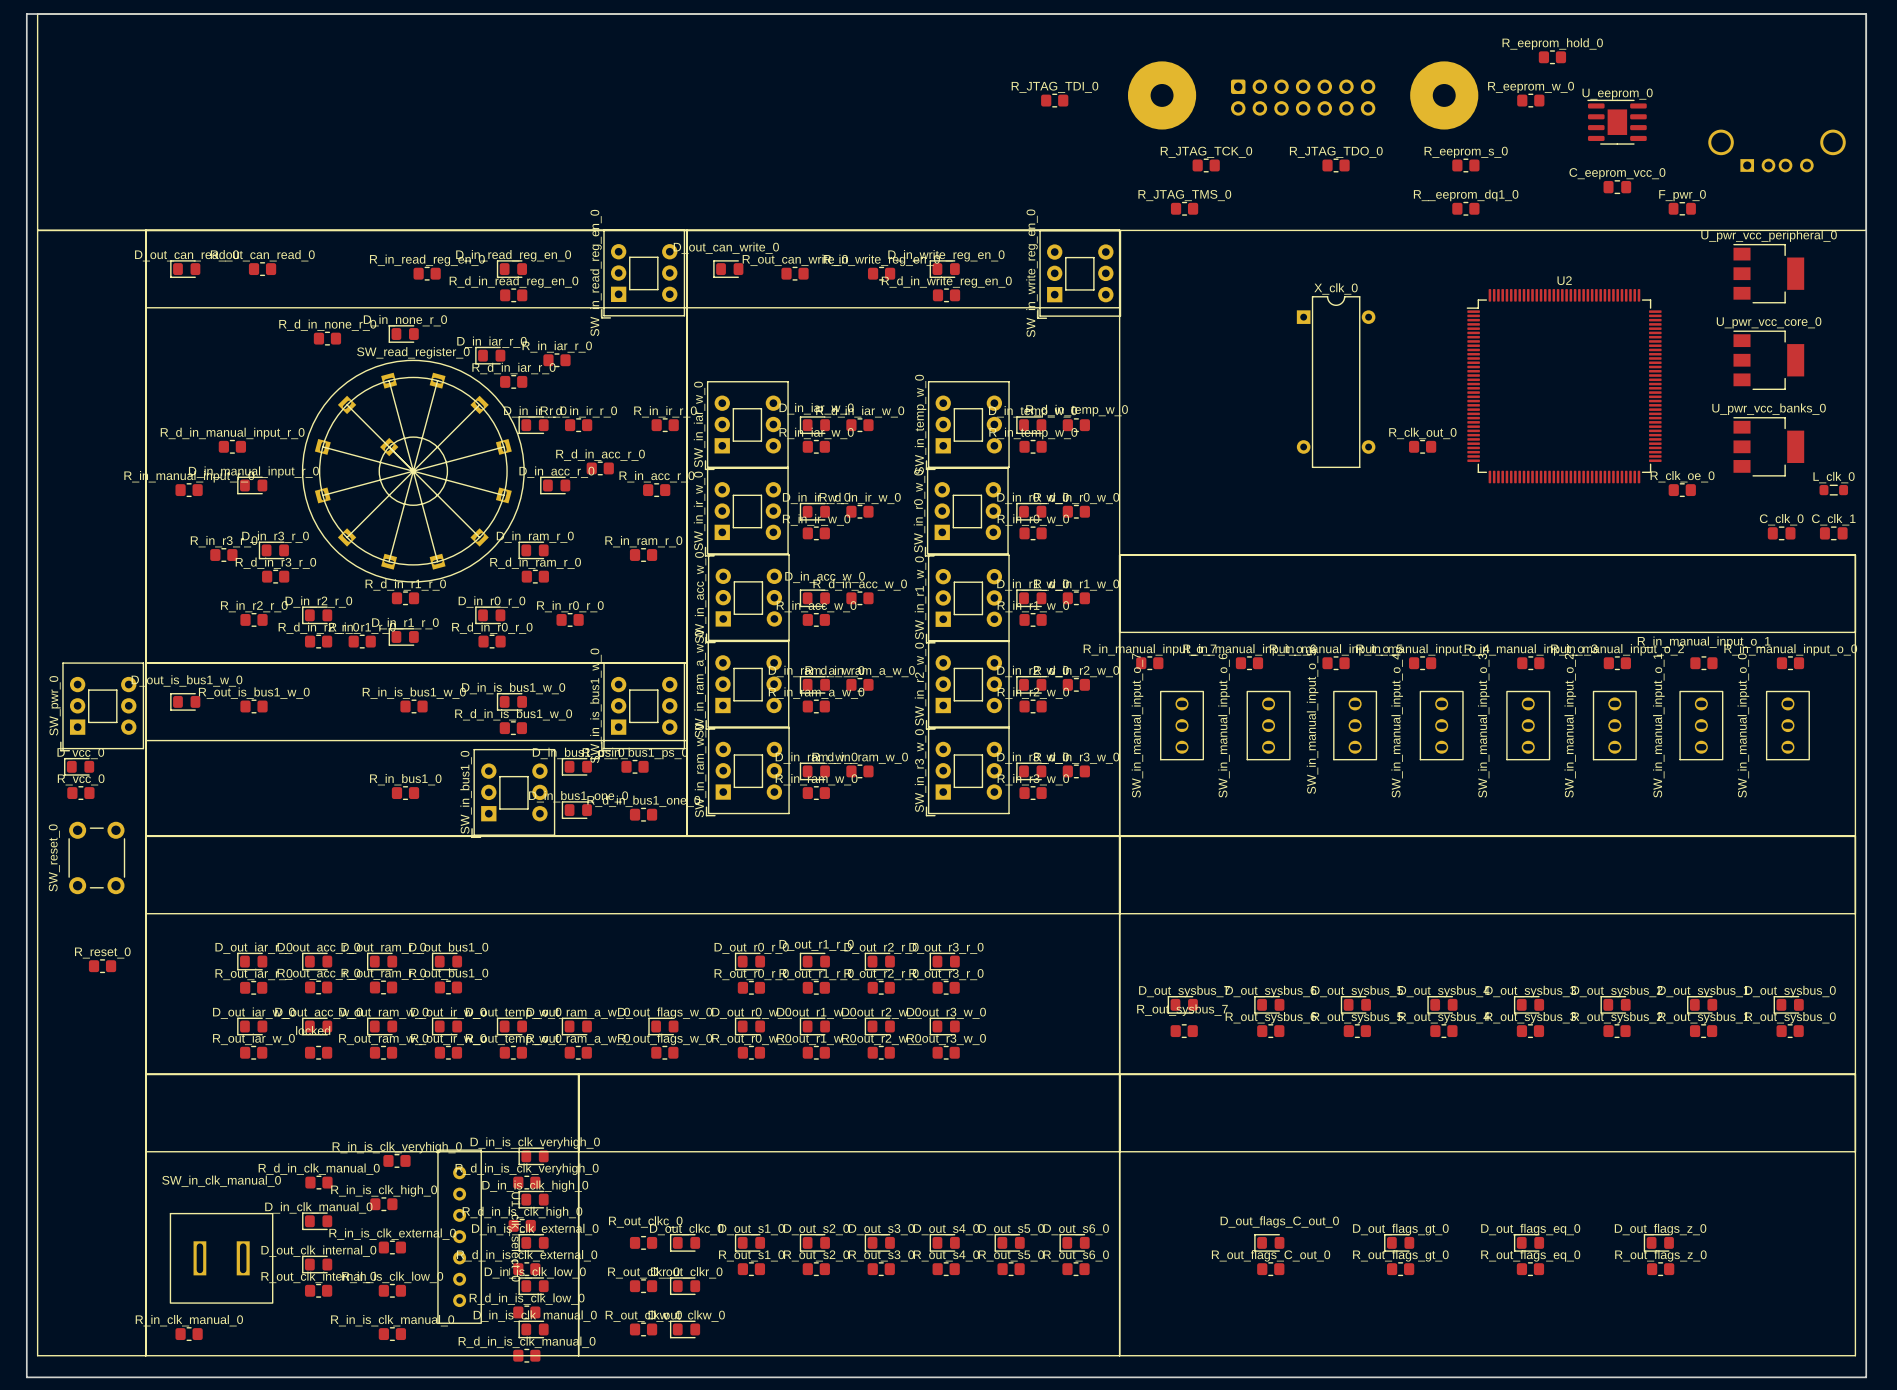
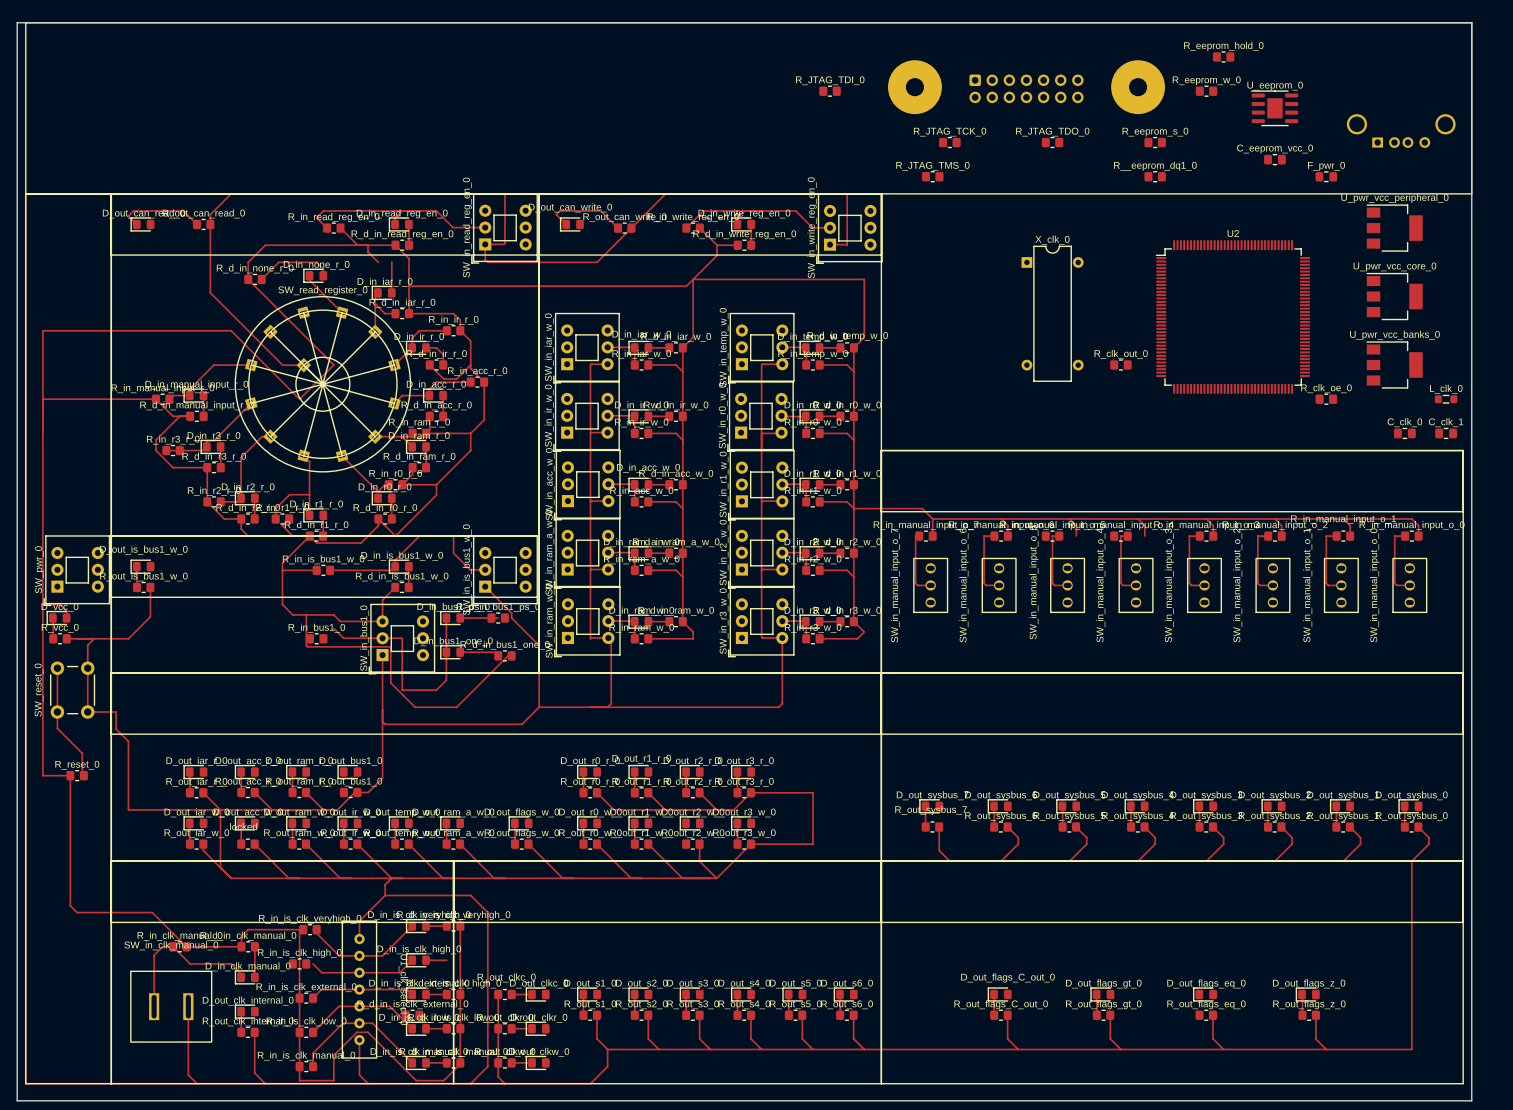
top track: none -> (231, 193) (210, 214) (210, 292) (282, 365) (303, 365)
top track: none -> (402, 210) (395, 218) (395, 224)
top track: none -> (744, 210) (737, 218) (737, 224)
top track: none -> (136, 224) (128, 216) (133, 210) (183, 210) (196, 224)
top track: none -> (408, 224) (408, 245)
top track: none -> (566, 224) (556, 214) (559, 210) (600, 210) (617, 228)
top track: none -> (751, 224) (751, 245)
top track: none -> (340, 228) (357, 245)
top track: none -> (485, 227) (453, 227) (436, 210) (323, 210) (316, 217) (327, 228)
top track: none -> (699, 228) (717, 245)
top track: none -> (830, 227) (812, 228) (795, 210) (703, 210) (686, 228)
top track: none -> (830, 244) (847, 245) (847, 193) (665, 193) (597, 262) (487, 262) (485, 259) (485, 244) (504, 243) (504, 193) (25, 193) (25, 1083) (590, 1083) (607, 1066) (607, 1049)
top track: none -> (368, 245) (368, 251) (378, 262)
top track: none -> (717, 245) (737, 245)
top track: none -> (717, 245) (717, 255) (686, 286) (408, 286)
top track: none -> (391, 262) (391, 292)
top track: none -> (309, 275) (309, 280) (342, 312)
top track: none -> (323, 275) (323, 268) (316, 262) (278, 262) (261, 279)
top track: none -> (377, 292) (375, 295) (375, 331)
R_in_iar_r_0: (556, 360) -> none
top track: none -> (375, 303) (385, 313) (395, 313)
top track: none -> (446, 330) (419, 330) (412, 337) (412, 347) (394, 365)
top track: none -> (611, 347) (634, 347) (634, 364)
top track: none -> (782, 347) (805, 347) (806, 364)
top track: none -> (425, 347) (436, 347) (443, 354) (443, 364)
R_d_in_ir_r_0 position: (578, 425) -> (436, 364)
R_in_ir_r_0 position: (665, 425) -> (453, 330)
top track: none -> (648, 347) (669, 347)
top track: none -> (819, 347) (840, 347)
top track: none -> (611, 364) (590, 364) (590, 638) (611, 637) (611, 703) (607, 707)
top track: none -> (782, 364) (761, 364) (761, 637) (782, 637) (782, 703) (778, 707) (539, 707)
R_d_in_manual_input_r_0 position: (232, 446) -> (196, 416)
top track: none -> (251, 365) (213, 365) (189, 389) (189, 395) (173, 395) (169, 399)
top track: none -> (429, 364) (443, 379) (456, 379) (470, 364)
top track: none -> (648, 364) (676, 364) (682, 371)
top track: none -> (819, 364) (847, 364) (853, 371)
top track: none -> (470, 382) (436, 382) (429, 389) (429, 395) (402, 395) (394, 403)
R_d_in_acc_r_0 position: (600, 468) -> (436, 416)
top track: none -> (203, 395) (203, 416)
top track: none -> (443, 395) (443, 416)
top track: none -> (42, 399) (155, 399) (173, 416) (190, 416)
R_in_manual_input_r_0 position: (189, 490) -> (162, 399)
R_in_acc_r_0 position: (656, 490) -> (477, 382)
top track: none -> (251, 403) (214, 440) (206, 440) (206, 446) (203, 450) (169, 450)
top track: none -> (179, 416) (155, 440) (155, 450) (173, 467) (207, 467) (207, 501) (224, 518) (241, 518) (241, 529) (248, 536) (309, 536)
top track: none -> (429, 416) (429, 429) (426, 433) (470, 433)
top track: none -> (611, 415) (634, 415) (634, 433)
top track: none -> (648, 416) (669, 416)
top track: none -> (819, 416) (840, 416)
top track: none -> (782, 416) (805, 416) (806, 433)
top track: none -> (611, 432) (590, 433)
top track: none -> (412, 433) (409, 436) (375, 436)
top track: none -> (470, 433) (484, 419) (484, 382) (470, 368) (470, 341) (460, 330) (460, 320) (453, 313) (408, 313) (408, 258) (395, 245) (265, 245) (248, 262) (248, 279) (333, 364) (299, 399) (231, 330) (42, 330) (42, 775) (70, 775) (70, 905) (77, 912) (152, 912) (186, 946) (241, 946) (241, 936) (248, 929) (299, 929) (299, 1080) (333, 1080) (333, 1055) (356, 1032) (368, 1032) (416, 1080) (443, 1080) (460, 1064) (460, 919)
top track: none -> (470, 433) (470, 450) (436, 484)
top track: none -> (648, 433) (676, 433) (682, 440)
top track: none -> (761, 433) (782, 433)
top track: none -> (819, 433) (847, 433) (853, 440)
top track: none -> (270, 436) (262, 436) (241, 457) (241, 498) (237, 501) (220, 501)
top track: none -> (401, 436) (412, 446)
top track: none -> (220, 446) (220, 467)
top track: none -> (425, 446) (426, 467)
R_in_ram_r_0 position: (643, 555) -> (419, 433)
top track: none -> (303, 455) (309, 461) (309, 515)
top track: none -> (342, 455) (377, 491) (384, 484) (388, 484)
top track: none -> (412, 467) (412, 474) (402, 484) (436, 484)
top track: none -> (611, 484) (634, 484) (634, 501)
top track: none -> (782, 484) (805, 484) (806, 501)
R_d_in_r1_r_0 position: (405, 598) -> (316, 536)
top track: none -> (436, 484) (436, 495) (395, 536) (378, 518) (378, 525) (361, 543) (316, 543) (309, 536)
top track: none -> (648, 484) (669, 484)
top track: none -> (819, 484) (840, 484)
top track: none -> (309, 494) (289, 494) (275, 508) (275, 518)
top track: none -> (254, 498) (254, 518)
top track: none -> (391, 498) (391, 518)
top track: none -> (611, 501) (590, 501)
top track: none -> (782, 501) (761, 501)
R_in_r2_r_0 position: (254, 619) -> (214, 501)
R_in_r0_r_0 position: (570, 619) -> (395, 484)
top track: none -> (648, 501) (676, 501) (682, 508)
top track: none -> (819, 501) (847, 501) (853, 508) (922, 508) (932, 518)
top track: none -> (323, 515) (323, 536)
top track: none -> (289, 518) (282, 525) (292, 536)
top track: none -> (932, 518) (1411, 518) (1418, 525) (1418, 536)
top track: none -> (932, 518) (932, 536)
top track: none -> (1001, 518) (1007, 525) (1007, 536)
top track: none -> (1069, 518) (1076, 525) (1076, 536)
top track: none -> (1138, 518) (1144, 525) (1144, 536)
top track: none -> (1206, 518) (1213, 525) (1213, 536)
top track: none -> (1274, 518) (1281, 525) (1281, 536)
top track: none -> (1343, 518) (1350, 525) (1350, 536)
top track: none -> (309, 536) (282, 563) (282, 604) (292, 614) (333, 614) (340, 621) (382, 621) (382, 600) (395, 587)
R_in_manual_input_o_7 position: (1149, 663) -> (925, 536)
top track: none -> (919, 536) (915, 536) (915, 583) (917, 585) (930, 585)
R_in_manual_input_o_6 position: (1249, 663) -> (1001, 536)
top track: none -> (994, 536) (984, 536) (984, 583) (986, 585) (999, 585)
top track: none -> (1062, 536) (1052, 536) (1052, 583) (1054, 585) (1067, 585)
top track: none -> (1131, 536) (1120, 536) (1120, 583) (1122, 585) (1136, 585)
top track: none -> (1199, 536) (1189, 536) (1189, 583) (1191, 585) (1204, 585)
top track: none -> (1268, 536) (1257, 536) (1257, 583) (1259, 585) (1272, 585)
top track: none -> (1336, 536) (1326, 536) (1326, 583) (1328, 585) (1341, 585)
top track: none -> (1405, 536) (1394, 536) (1394, 583) (1396, 585) (1409, 585)
top track: none -> (611, 552) (634, 552) (634, 570)
top track: none -> (648, 553) (669, 553)
top track: none -> (782, 552) (805, 552) (806, 570)
top track: none -> (819, 553) (840, 553)
top track: none -> (136, 566) (136, 587)
top track: none -> (408, 566) (408, 587)
top track: none -> (485, 569) (470, 569) (453, 553) (453, 536) (419, 536) (395, 560) (395, 566) (391, 570) (330, 570)
top track: none -> (611, 569) (590, 570)
top track: none -> (782, 569) (761, 570)
R_out_is_bus1_w_0 position: (254, 706) -> (143, 587)
top track: none -> (282, 570) (316, 570)
top track: none -> (648, 570) (676, 570) (682, 577)
top track: none -> (819, 570) (847, 570) (853, 577)
top track: none -> (485, 586) (511, 613) (511, 618) (539, 645) (539, 707)
top track: none -> (150, 587) (150, 616) (128, 638) (66, 638)
top track: none -> (42, 604) (60, 604) (66, 611) (66, 618)
top track: none -> (306, 614) (307, 646) (390, 646) (390, 682) (415, 707) (456, 707) (511, 652)
top track: none -> (52, 618) (53, 638)
top track: none -> (446, 618) (446, 680) (436, 690) (402, 690) (401, 638) (343, 638) (333, 628)
top track: none -> (460, 618) (498, 618)
top track: none -> (611, 621) (634, 621) (634, 638)
top track: none -> (782, 621) (805, 621) (806, 638)
top track: none -> (648, 621) (669, 621)
top track: none -> (819, 621) (840, 621)
top track: none -> (94, 638) (87, 645) (87, 712) (116, 712) (116, 729) (128, 741) (128, 809) (337, 809) (354, 792) (368, 792) (382, 778) (382, 655)
top track: none -> (648, 638) (693, 638) (693, 632) (682, 621) (682, 347) (693, 337) (693, 279) (864, 279) (864, 337) (853, 347) (853, 621) (864, 632) (857, 638) (819, 638)
top track: none -> (460, 652) (498, 652)
top track: none -> (57, 668) (57, 728) (82, 753) (83, 775)
top track: none -> (539, 707) (522, 724) (385, 724) (382, 721)
top track: none -> (189, 772) (189, 792)
top track: none -> (241, 772) (241, 792)
top track: none -> (292, 772) (292, 792)
top track: none -> (583, 772) (583, 792)
top track: none -> (634, 772) (634, 792)
top track: none -> (685, 772) (686, 792)
top track: none -> (737, 772) (737, 792)
top track: none -> (203, 792) (220, 809) (220, 867)
top track: none -> (254, 792) (272, 809)
top track: none -> (306, 792) (323, 809)
top track: none -> (596, 792) (614, 809) (733, 809) (750, 792) (812, 792) (812, 844) (750, 844) (716, 878)
top track: none -> (648, 792) (665, 809)
top track: none -> (699, 792) (716, 809)
top track: none -> (925, 806) (925, 827)
top track: none -> (993, 806) (994, 827)
top track: none -> (1062, 806) (1062, 827)
top track: none -> (1130, 806) (1131, 827)
top track: none -> (1199, 806) (1199, 827)
top track: none -> (1267, 806) (1267, 827)
top track: none -> (1336, 806) (1336, 827)
top track: none -> (1404, 806) (1404, 827)
top track: none -> (189, 823) (189, 844)
top track: none -> (241, 823) (241, 844)
top track: none -> (292, 823) (292, 844)
top track: none -> (343, 823) (343, 844)
top track: none -> (395, 823) (395, 844)
top track: none -> (446, 823) (446, 844)
top track: none -> (514, 823) (515, 844)
top track: none -> (583, 823) (583, 844)
top track: none -> (634, 823) (634, 844)
top track: none -> (737, 823) (737, 844)
top track: none -> (939, 827) (939, 850) (949, 861)
top track: none -> (1007, 827) (1018, 837) (1018, 844) (1001, 861)
top track: none -> (1076, 827) (1086, 837) (1086, 844) (1069, 861)
top track: none -> (1144, 827) (1155, 837) (1155, 844) (1138, 861)
top track: none -> (1212, 827) (1223, 837) (1223, 844) (1206, 861)
top track: none -> (1281, 827) (1292, 837) (1292, 844) (1274, 861)
top track: none -> (1349, 827) (1360, 837) (1360, 844) (1343, 861)
top track: none -> (1418, 827) (1428, 837) (1428, 844) (1411, 861) (1411, 1049) (607, 1049)
top track: none -> (203, 844) (203, 850) (231, 878) (716, 878)
top track: none -> (254, 844) (288, 878)
top track: none -> (306, 844) (340, 878)
top track: none -> (357, 844) (391, 878) (385, 884) (385, 895)
top track: none -> (408, 844) (442, 878)
top track: none -> (460, 844) (494, 878)
top track: none -> (528, 844) (562, 878)
top track: none -> (596, 844) (631, 878)
top track: none -> (648, 844) (682, 878)
top track: none -> (699, 844) (699, 861) (716, 878)
top track: none -> (385, 895) (470, 895) (487, 912) (487, 1066) (470, 1083)
top track: none -> (385, 895) (359, 921) (359, 939)
top track: none -> (412, 926) (382, 955) (339, 955) (313, 929)
top track: none -> (425, 926) (446, 926)
top track: none -> (254, 946) (254, 977)
R_d_in_is_clk_veryhigh_0 position: (526, 1182) -> (453, 926)
top track: none -> (412, 960) (399, 972) (321, 972) (313, 963)
top track: none -> (425, 960) (446, 960)
top track: none -> (241, 977) (241, 973) (231, 963) (190, 963) (173, 946) (162, 946) (154, 955) (154, 1006)
R_d_in_is_clk_high_0 position: (522, 1225) -> (453, 994)
top track: none -> (412, 994) (407, 989) (321, 989) (313, 998)
top track: none -> (425, 994) (446, 994)
top track: none -> (498, 994) (498, 1076) (504, 1083)
top track: none -> (511, 994) (531, 994)
top track: none -> (583, 994) (583, 1015)
top track: none -> (634, 994) (634, 1015)
top track: none -> (685, 994) (686, 1015)
top track: none -> (737, 994) (737, 1015)
top track: none -> (788, 994) (788, 1015)
top track: none -> (839, 994) (840, 1015)
top track: none -> (993, 994) (994, 1015)
top track: none -> (1096, 994) (1096, 1015)
top track: none -> (1302, 994) (1302, 1015)
top track: none -> (188, 1006) (188, 1075) (196, 1083)
top track: none -> (241, 1011) (241, 1032)
top track: none -> (596, 1015) (596, 1038) (607, 1049)
top track: none -> (648, 1015) (648, 1038) (658, 1049)
top track: none -> (699, 1015) (699, 1038) (710, 1049)
top track: none -> (750, 1015) (750, 1038) (761, 1049)
top track: none -> (802, 1015) (802, 1038) (812, 1049)
top track: none -> (853, 1015) (853, 1038) (864, 1049)
top track: none -> (1007, 1015) (1007, 1038) (1018, 1049)
top track: none -> (1110, 1015) (1110, 1038) (1120, 1049)
top track: none -> (1212, 1015) (1212, 1038) (1223, 1049)
top track: none -> (1315, 1015) (1315, 1039) (1326, 1049)
top track: none -> (412, 1028) (389, 1006) (338, 1006) (313, 1032)
top track: none -> (425, 1028) (446, 1028)
top track: none -> (511, 1028) (531, 1028)
top track: none -> (254, 1032) (254, 1073) (265, 1083)
top track: none -> (359, 1040) (359, 1075) (368, 1083)
R_d_in_is_clk_low_0 position: (526, 1312) -> (453, 1028)
top track: none -> (412, 1062) (372, 1023) (342, 1023) (313, 1053) (313, 1066) (316, 1066)
top track: none -> (425, 1062) (446, 1062)
top track: none -> (511, 1062) (531, 1062)
R_in_clk_manual_0 position: (189, 1334) -> (179, 946)
R_d_in_is_clk_manual_0 position: (526, 1355) -> (453, 1062)

